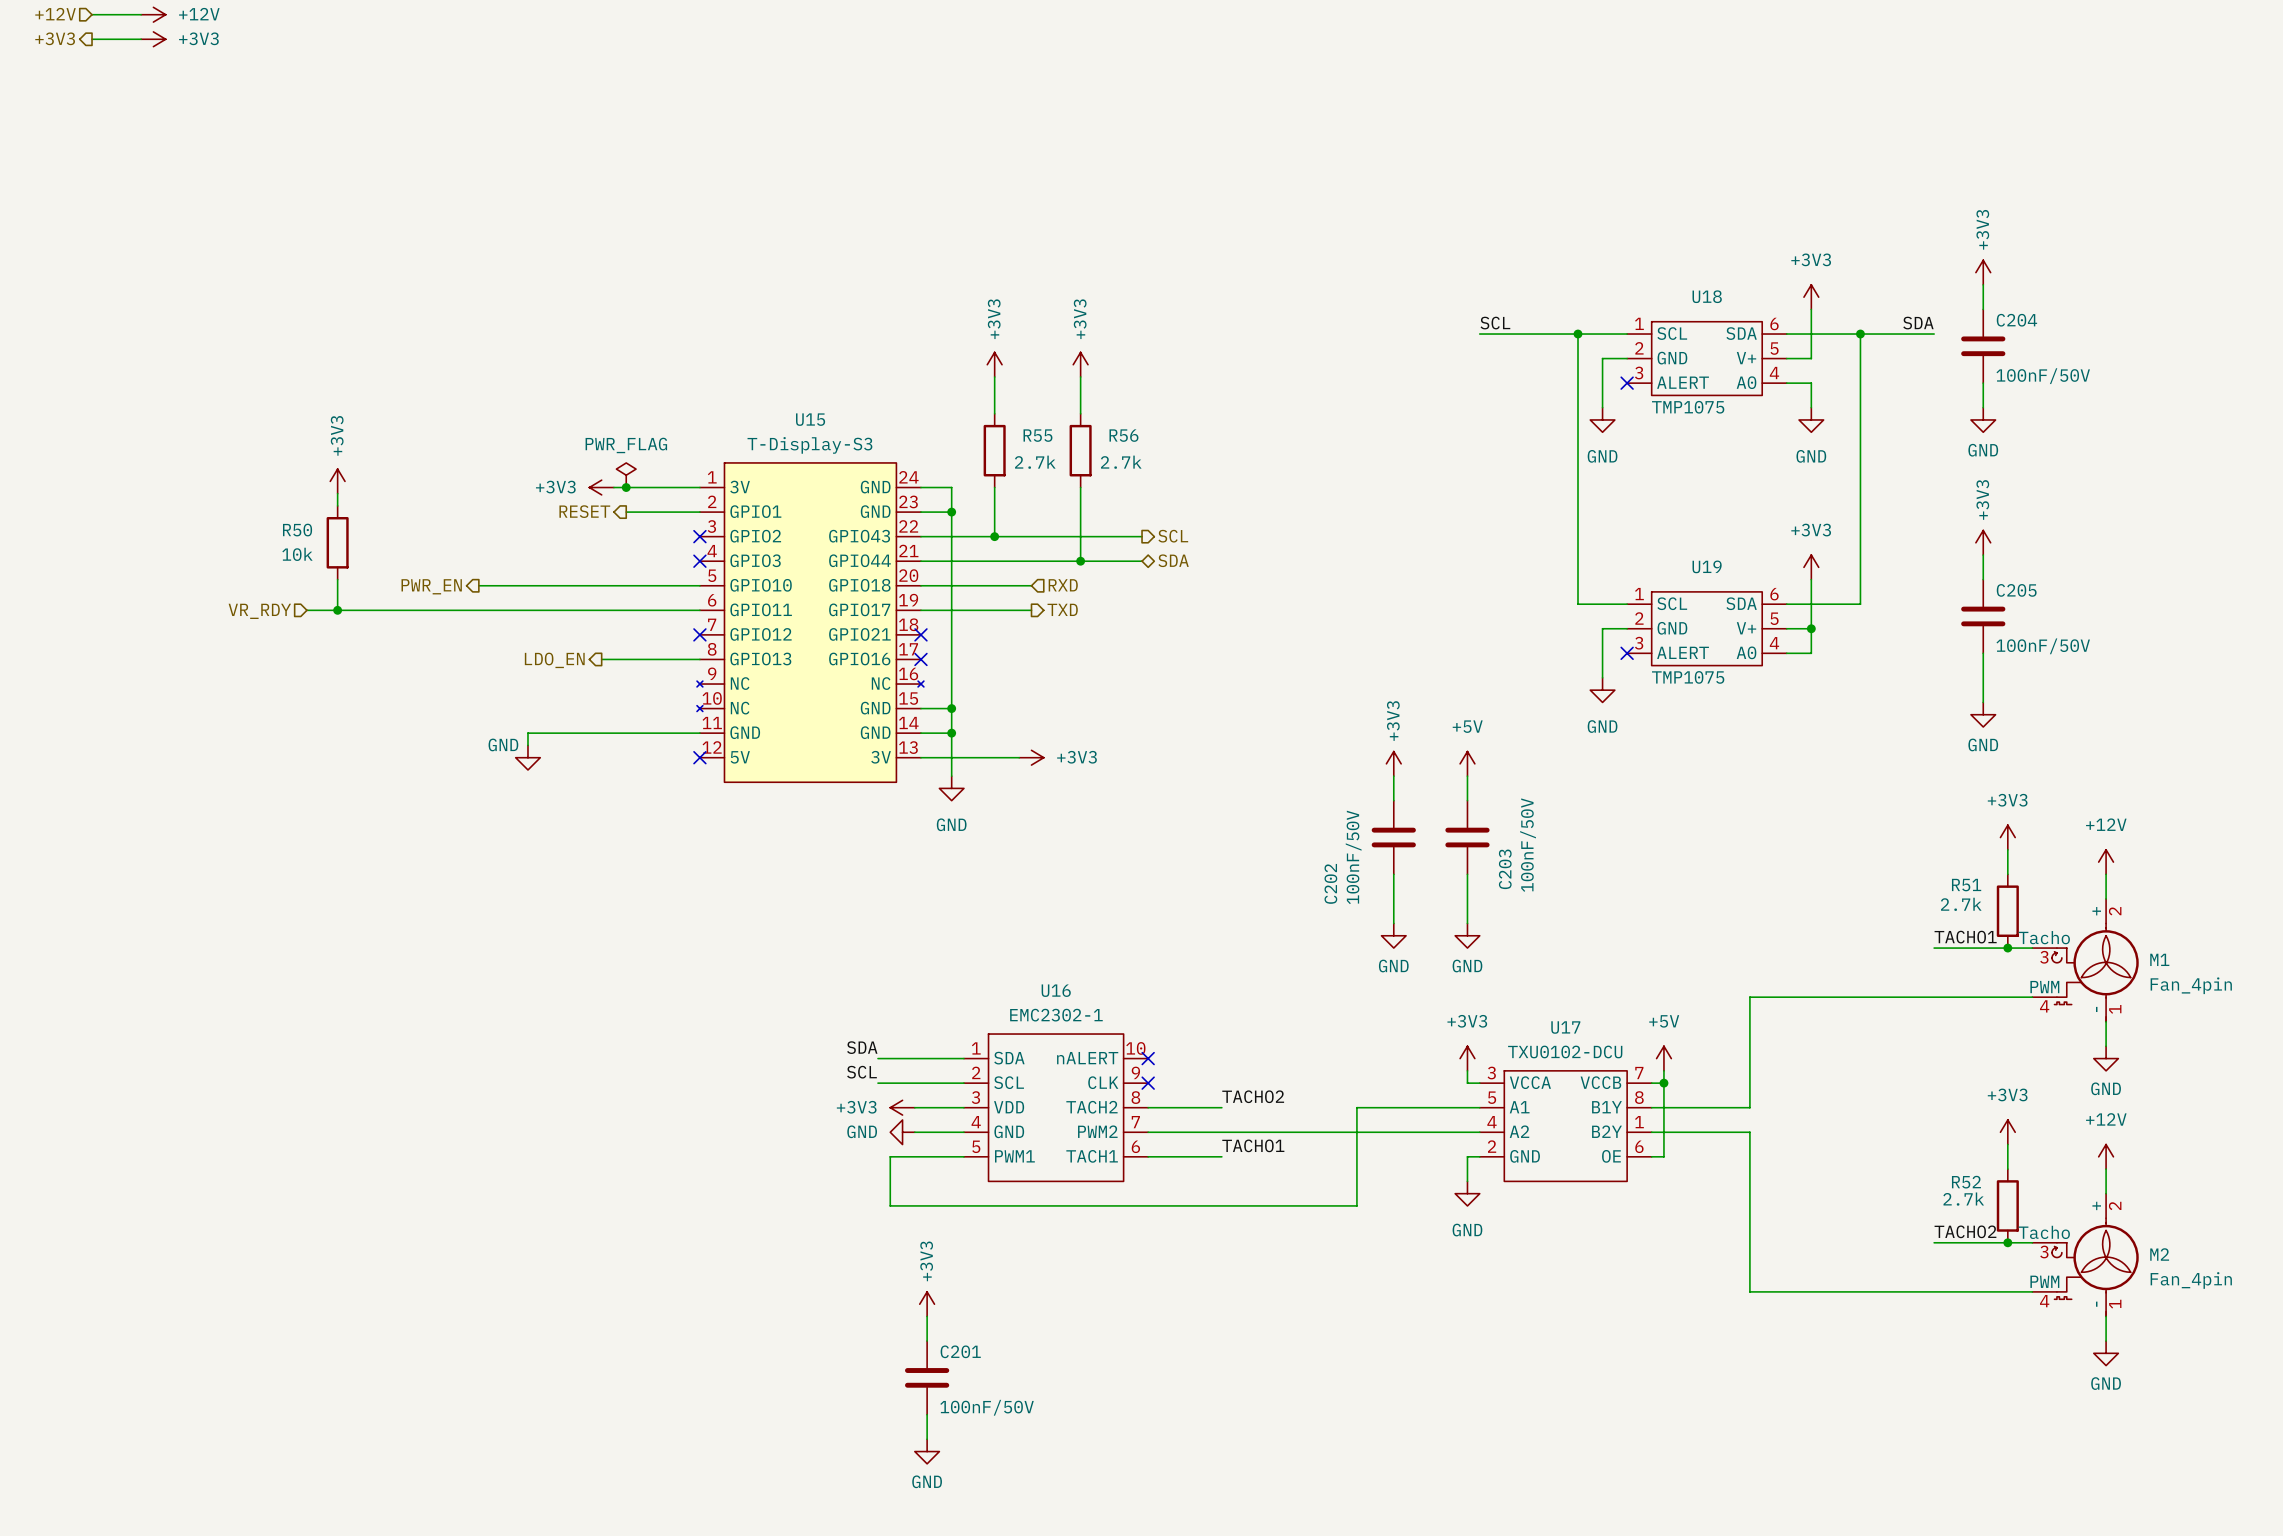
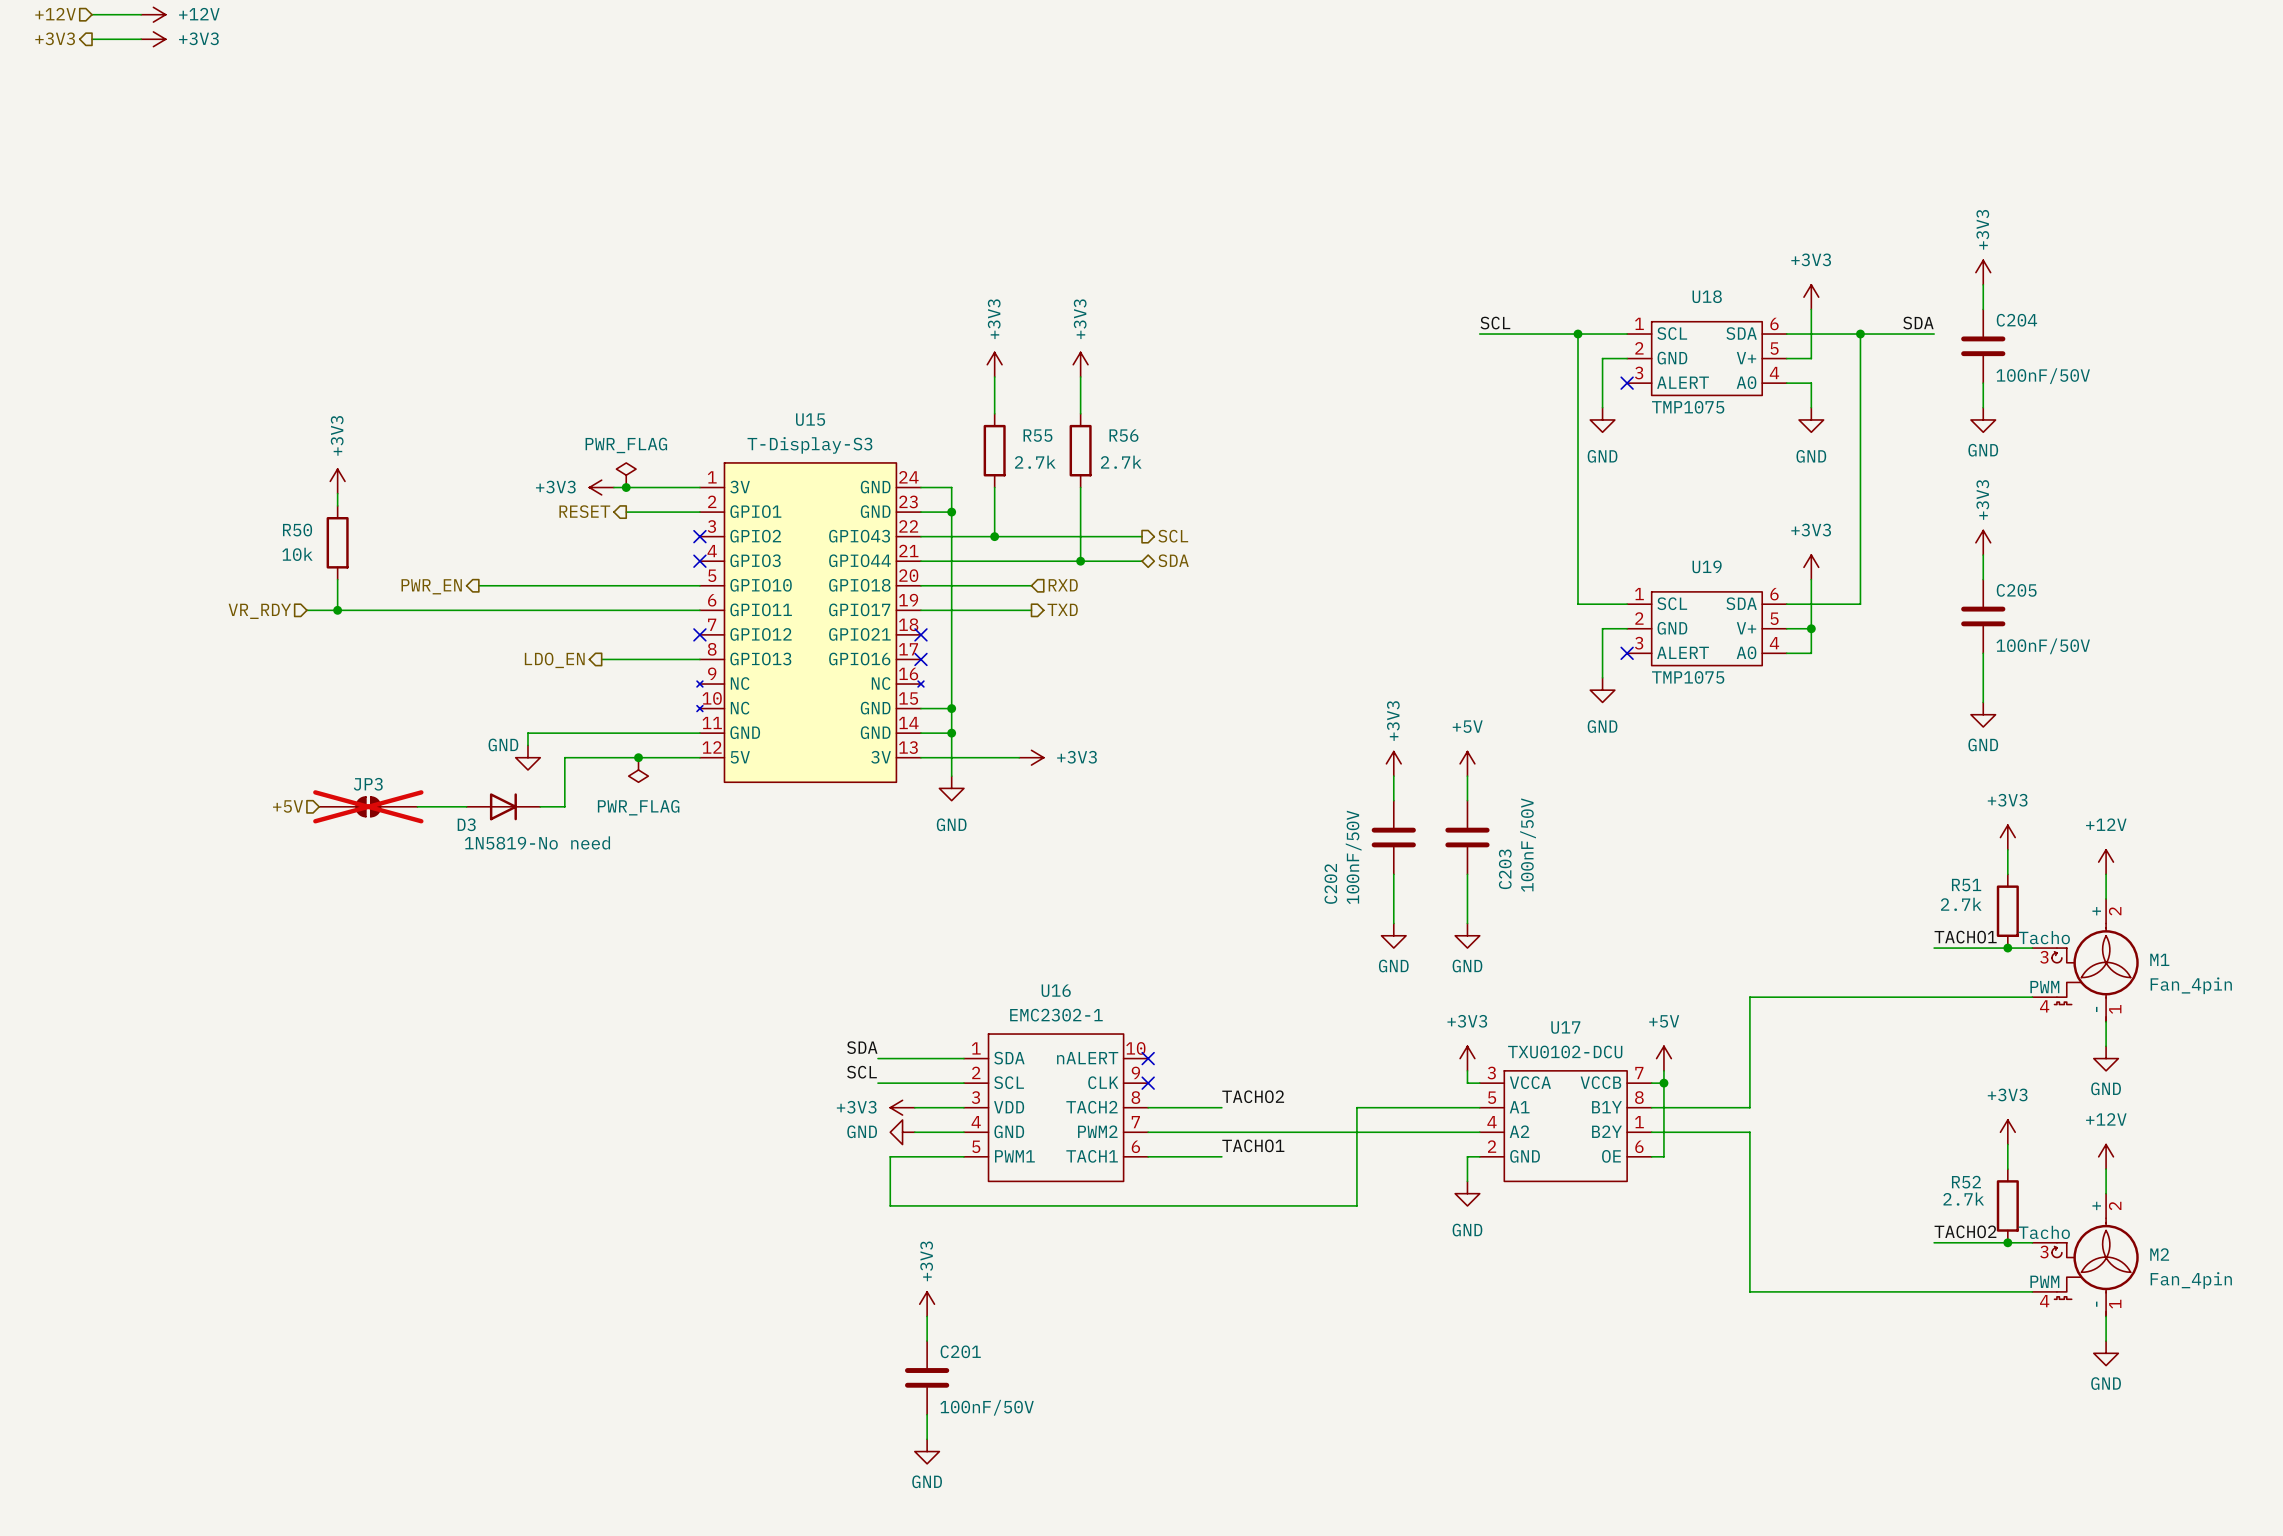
junction: none -> (638, 757)
wire: none -> (699, 757) (564, 757) (564, 806) (540, 806)
no-connect mark: (699, 757) -> none
power symbol: none -> PWR_FLAG (638, 769)
hierarchical label: none -> +5V (288, 806)
JP3: none -> (368, 806)
wire: none -> (417, 806) (466, 806)
D3: none -> 1N5819-No need (503, 806)

